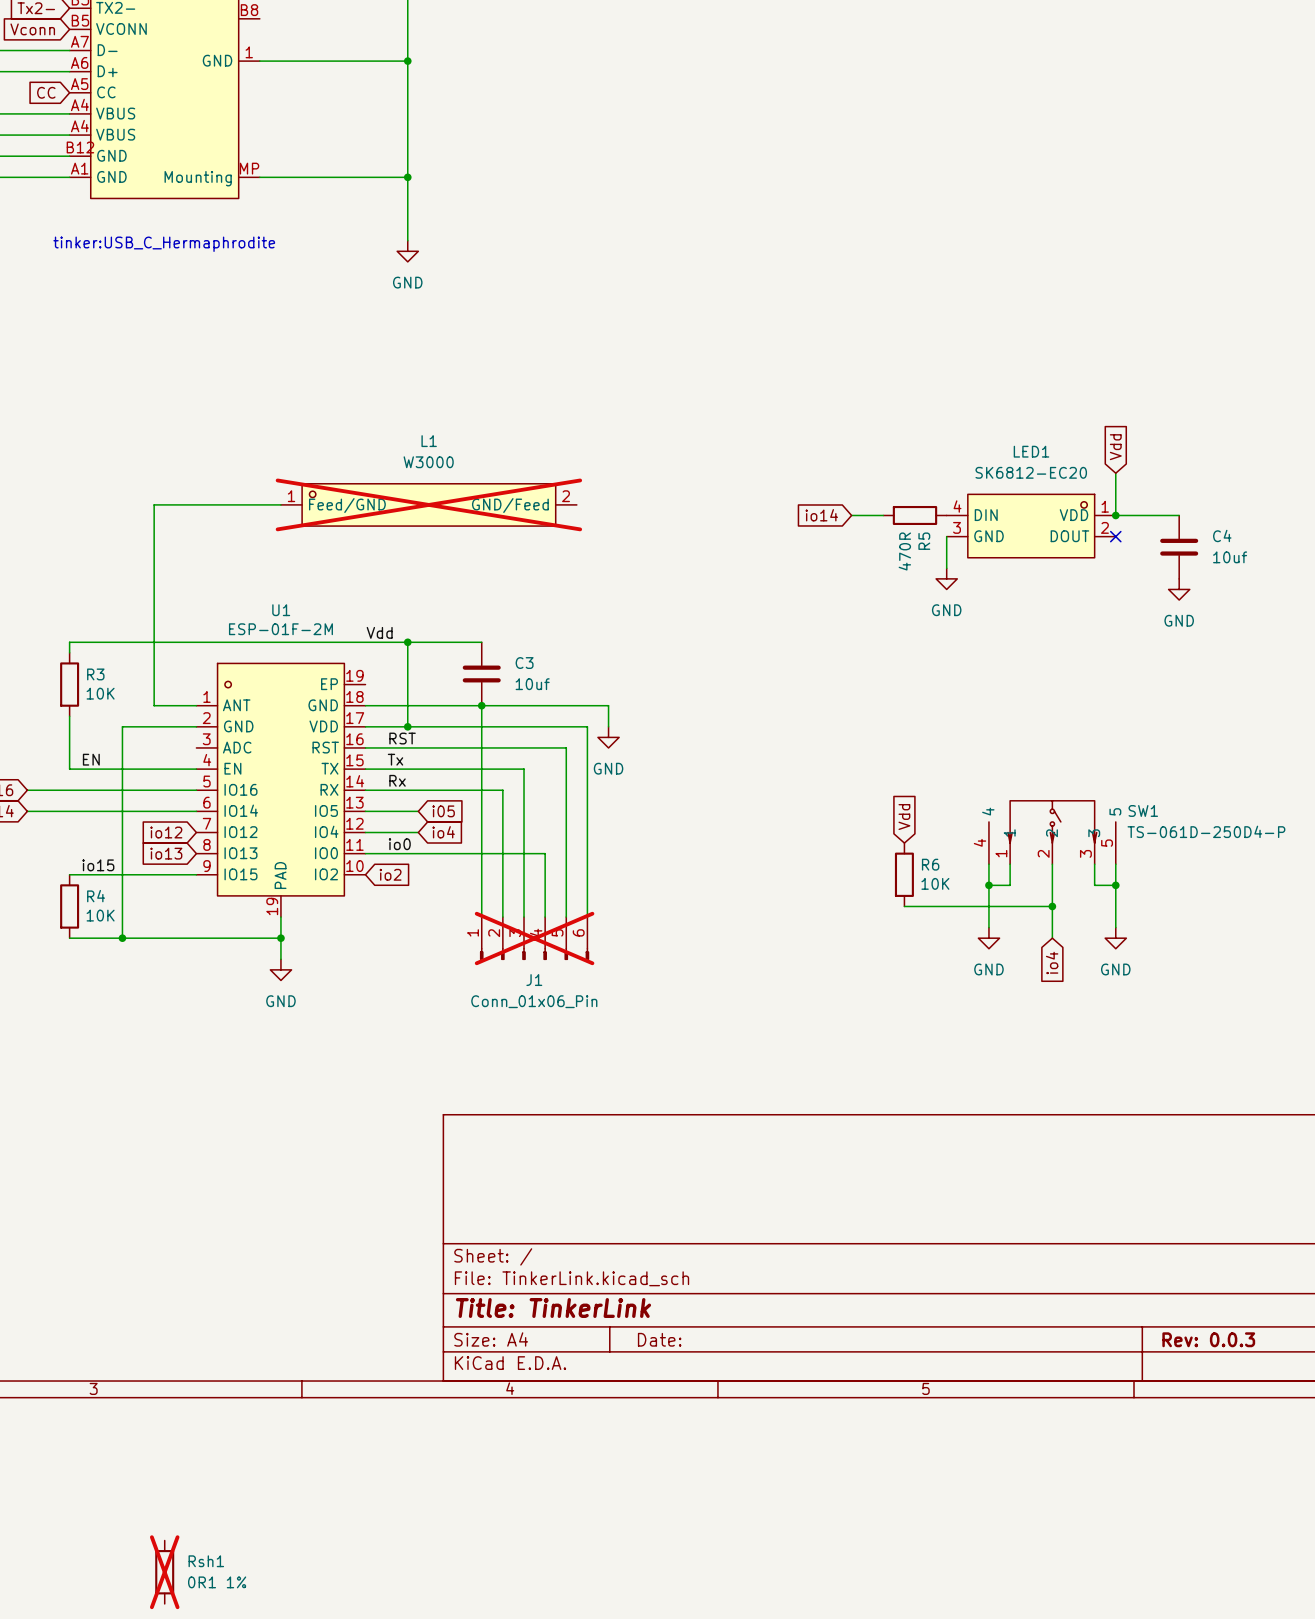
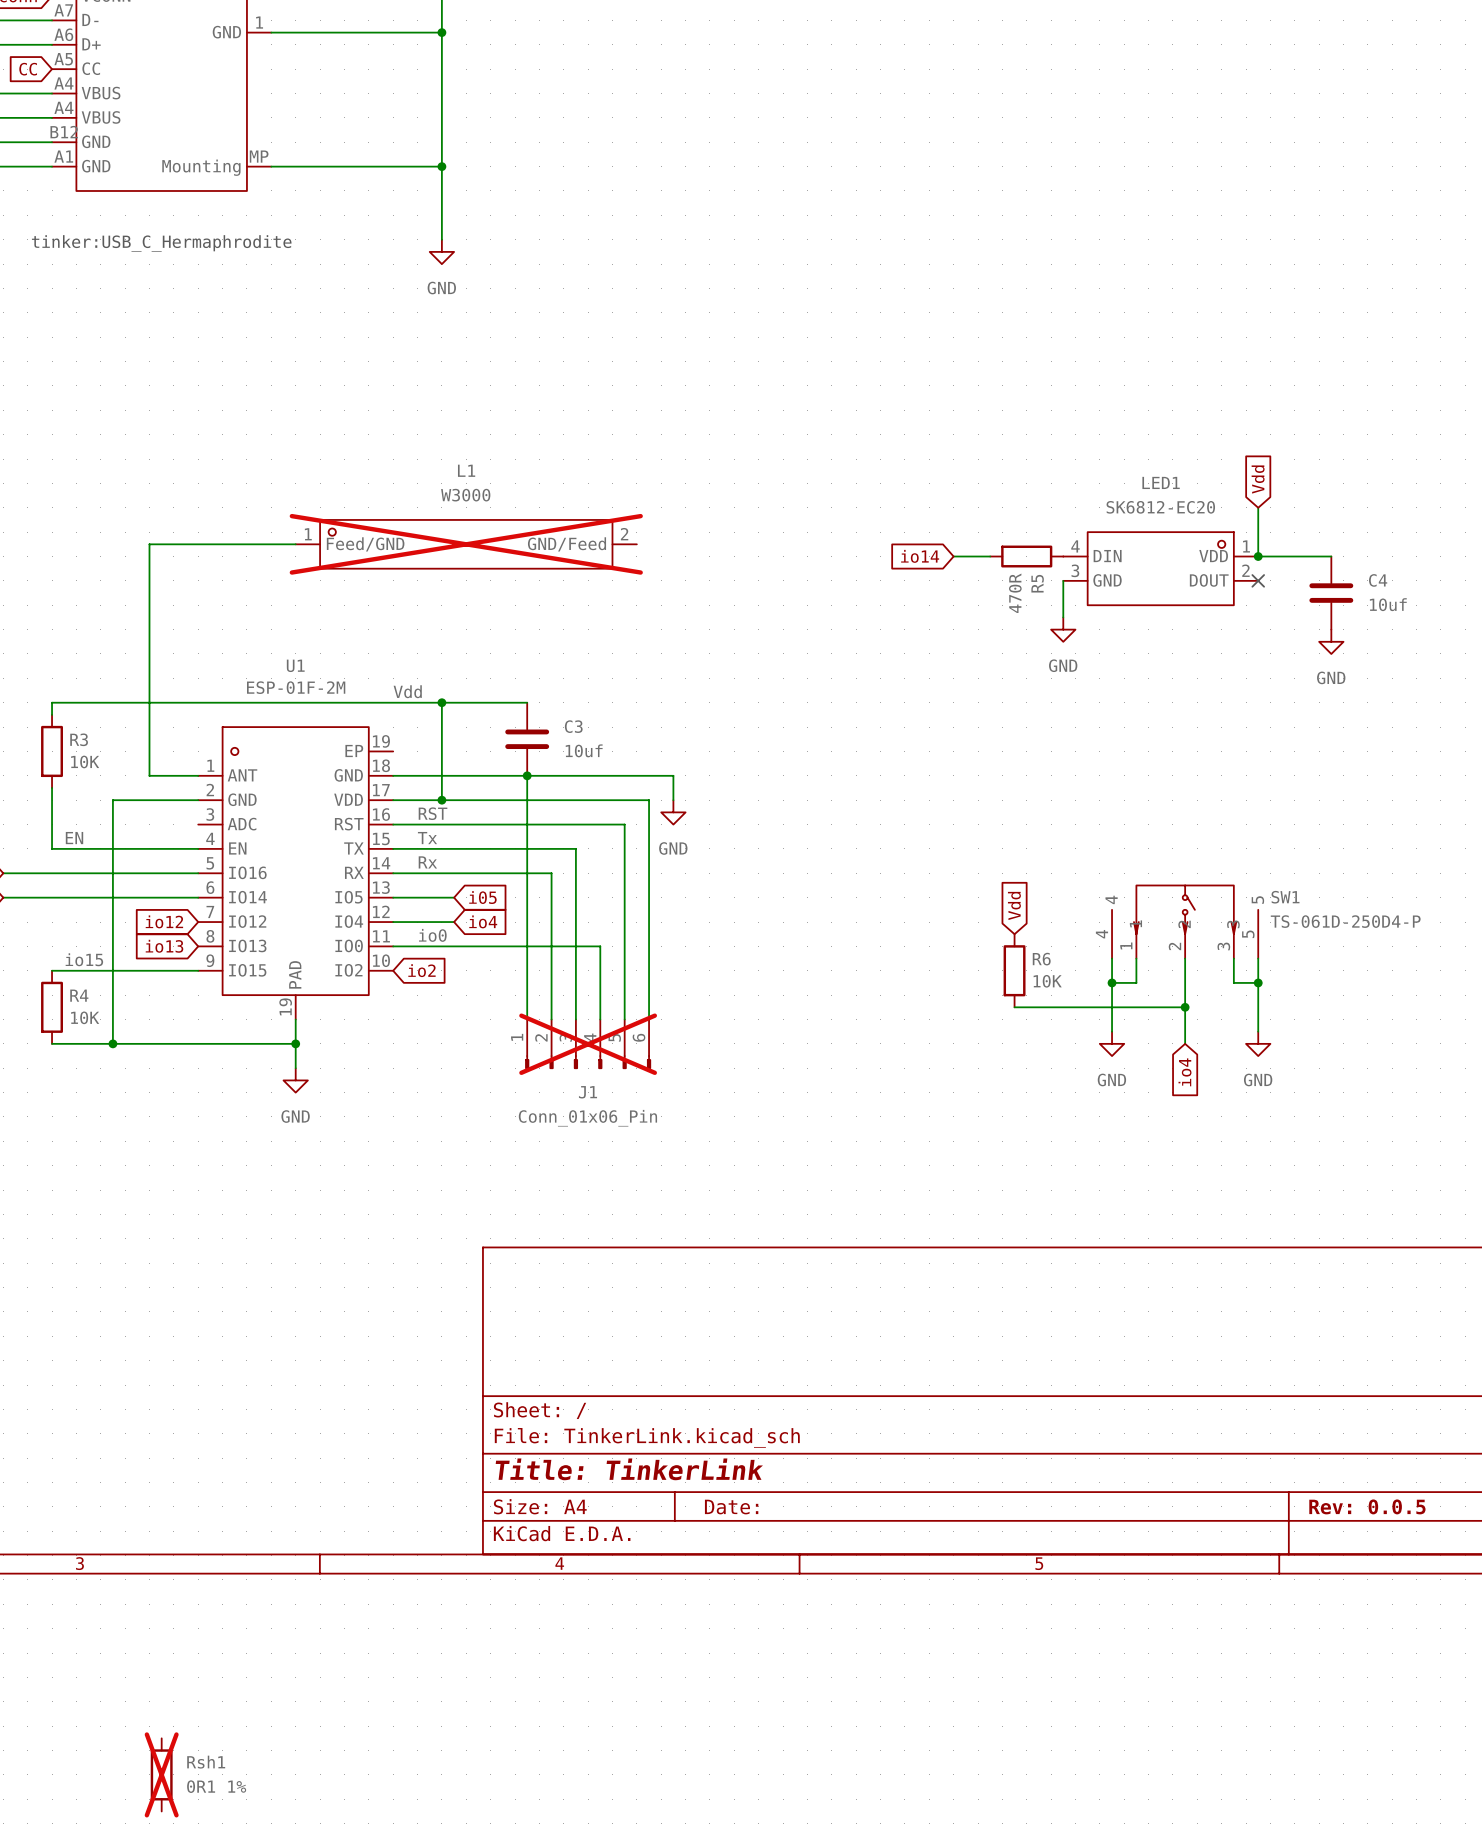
title block: Rev: 0.0.3 (1208, 1339) -> Rev: 0.0.5 (1367, 1506)

